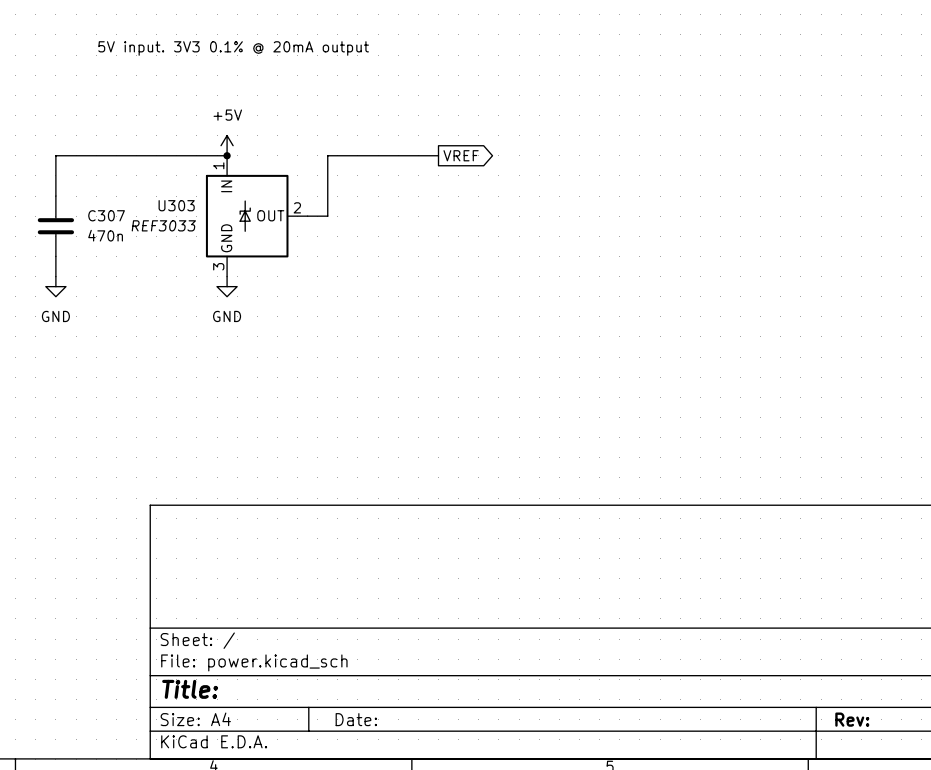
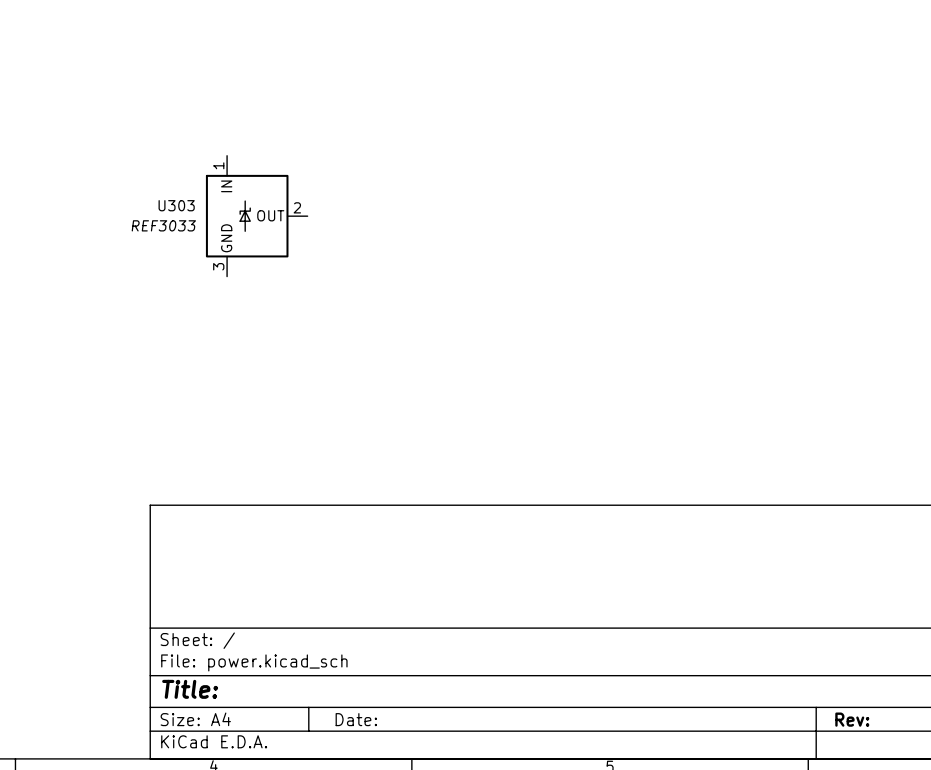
text: 5V input. 3V3 0.1% @ 20mA output (233, 48) -> none
power symbol: +5V (227, 145) -> none
wire: (227, 155) (55, 155) (55, 196) -> none
junction: (227, 155) -> none
wire: (438, 155) (327, 155) (327, 216) (307, 216) -> none
global label: VREF (461, 155) -> none
C307: 470n (55, 226) -> none
wire: (55, 256) (55, 276) -> none
power symbol: GND (55, 286) -> none
power symbol: GND (227, 286) -> none

